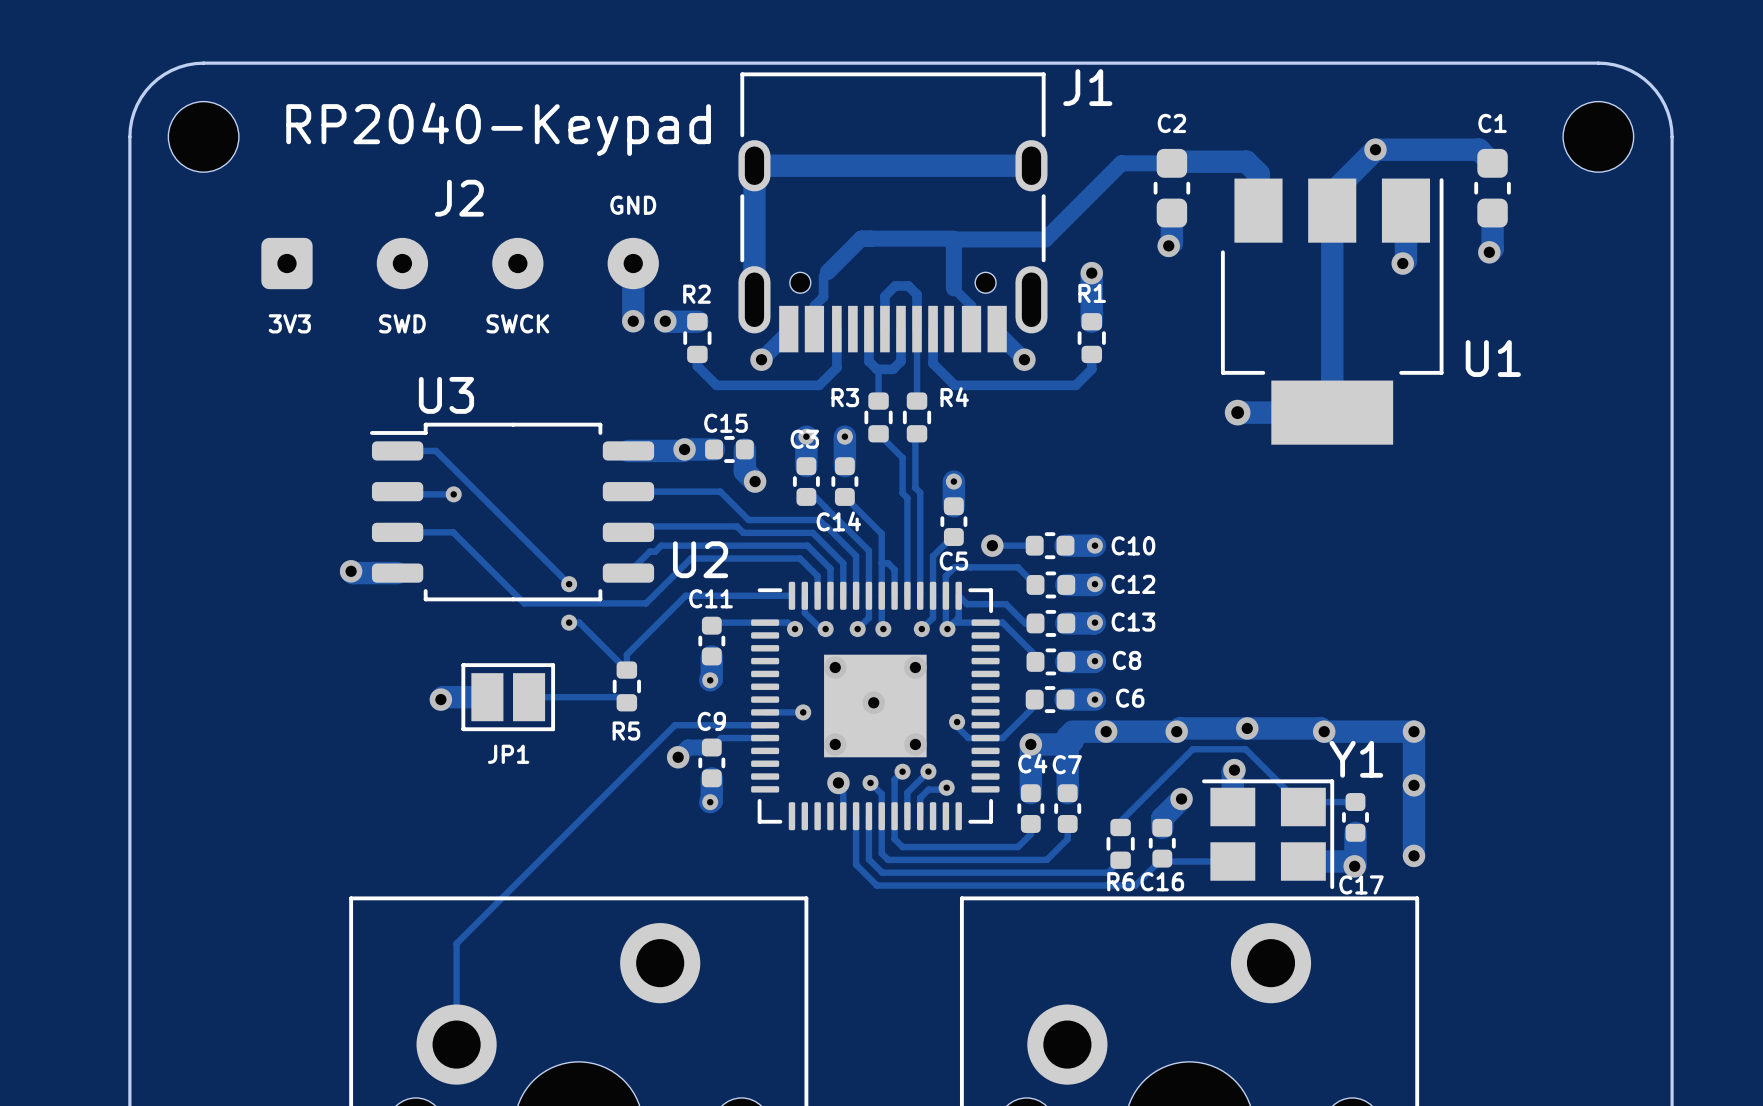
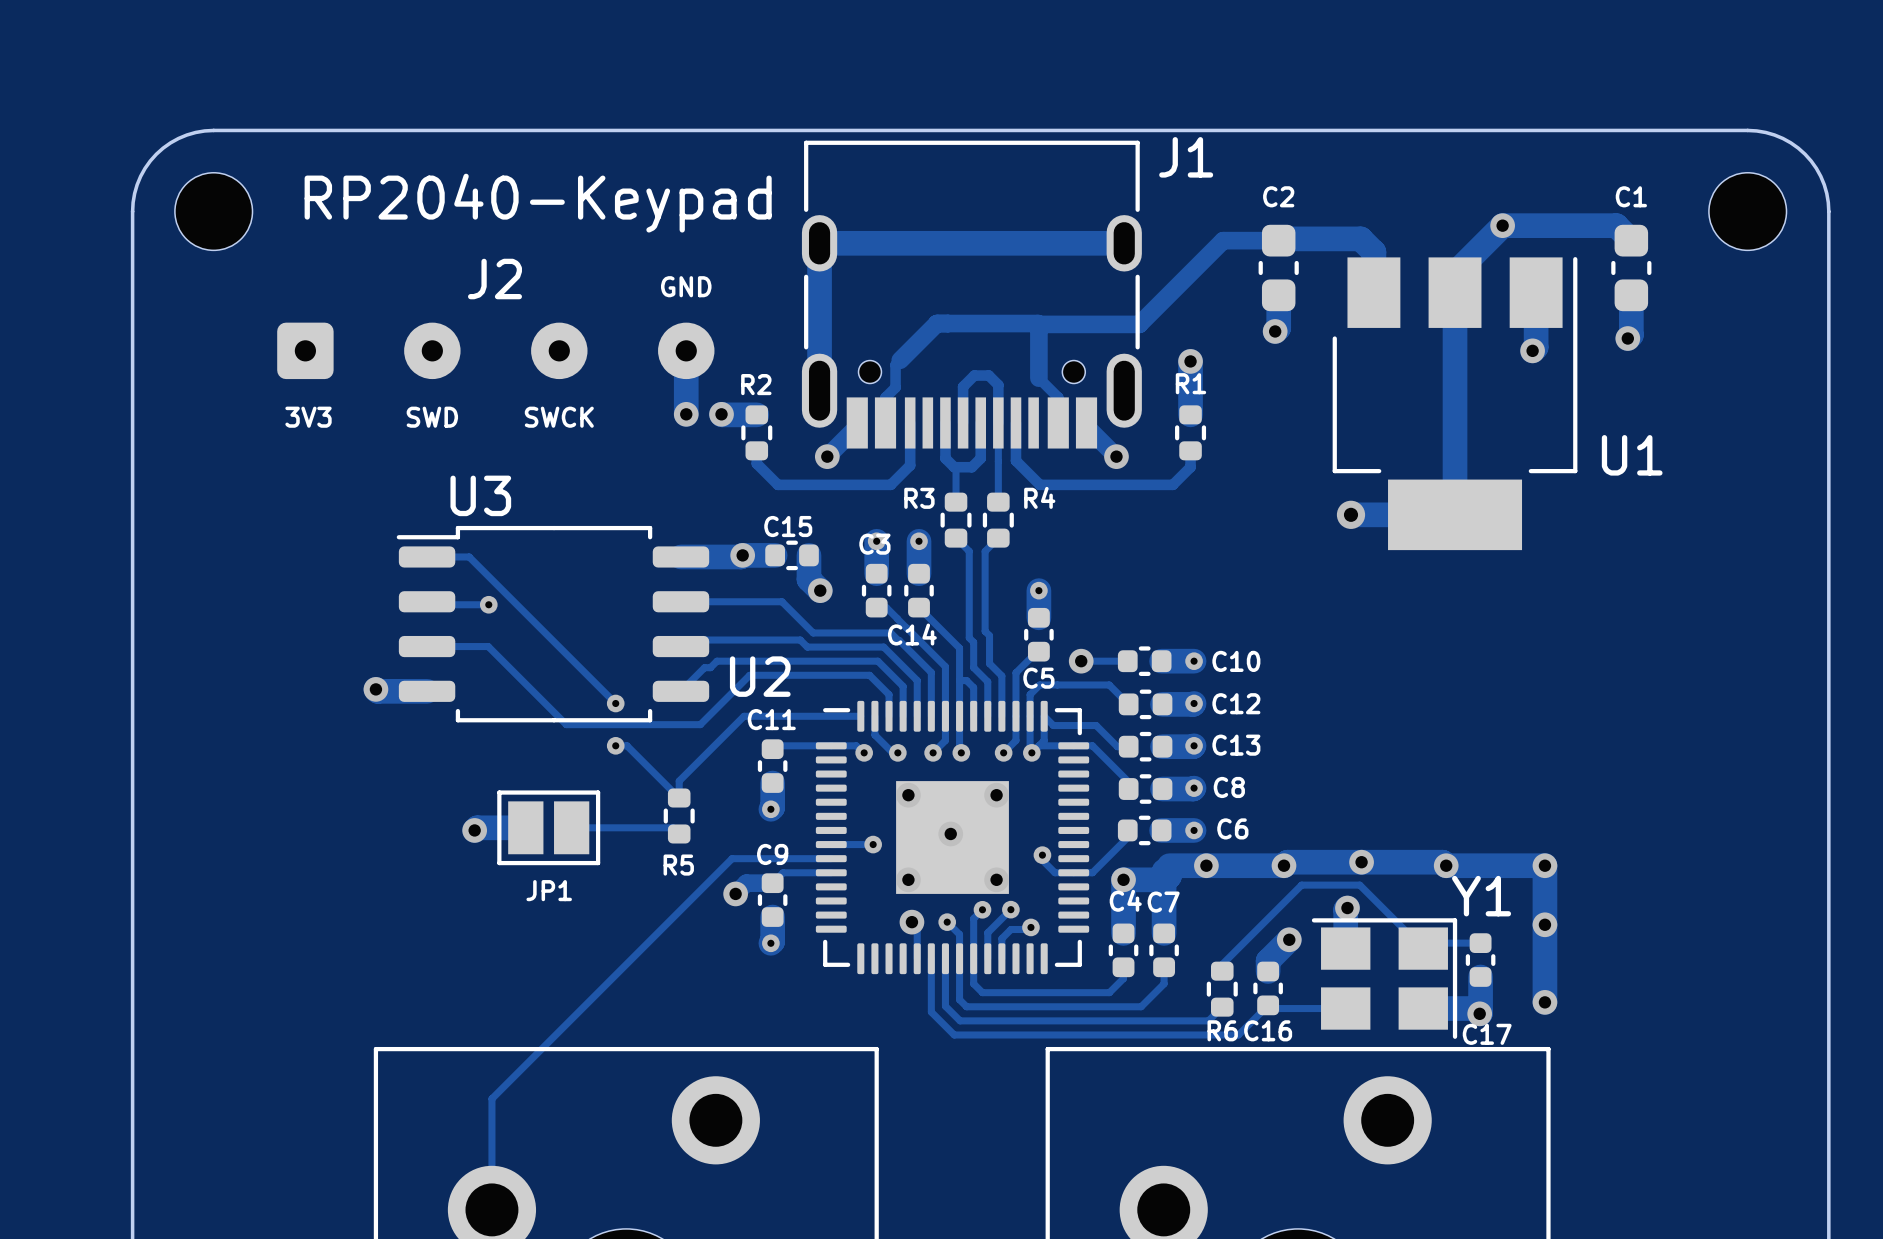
track: (915, 435) (915, 487) (920, 492) (920, 559) -> (996, 539) (985, 551) (985, 631) (989, 635) (989, 663) (1001, 675)
track: (890, 445) (902, 457) (902, 493) (907, 498) (907, 564) -> (969, 551) (969, 637) (973, 642) (973, 667) (987, 681)

